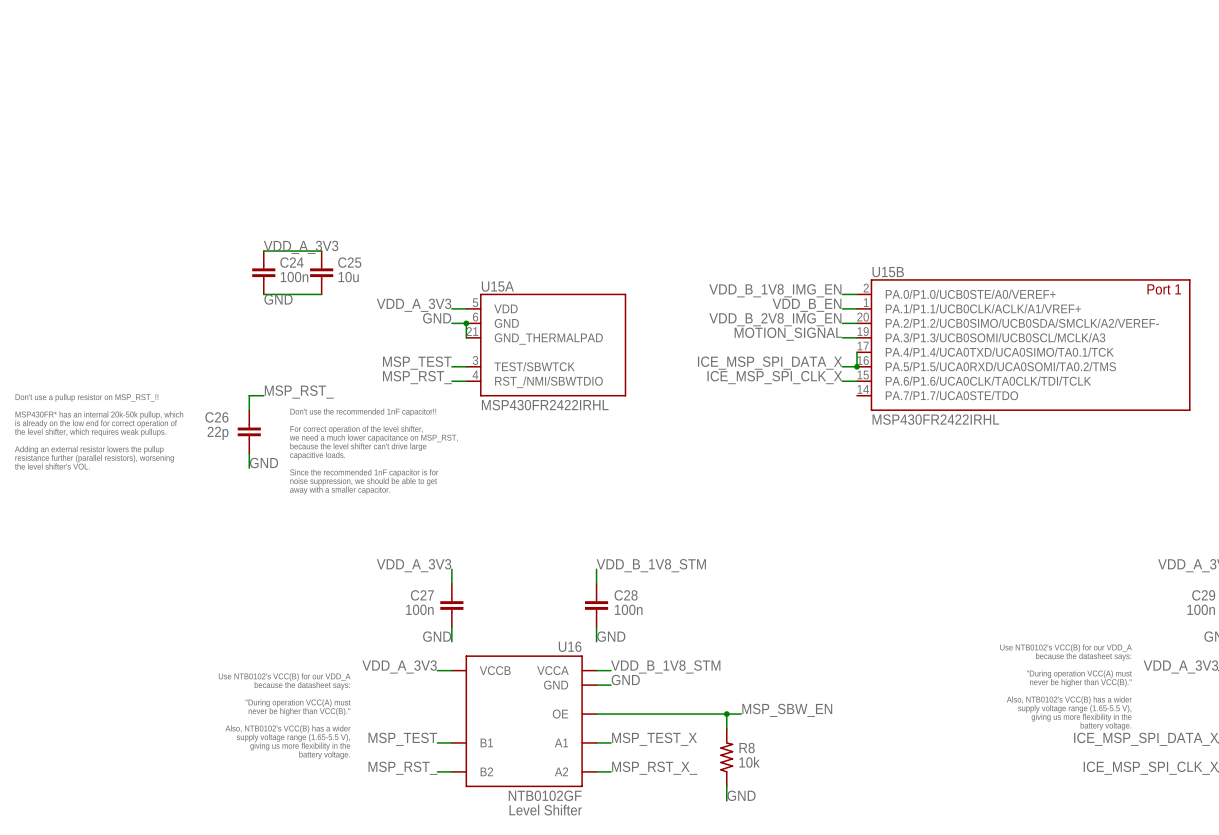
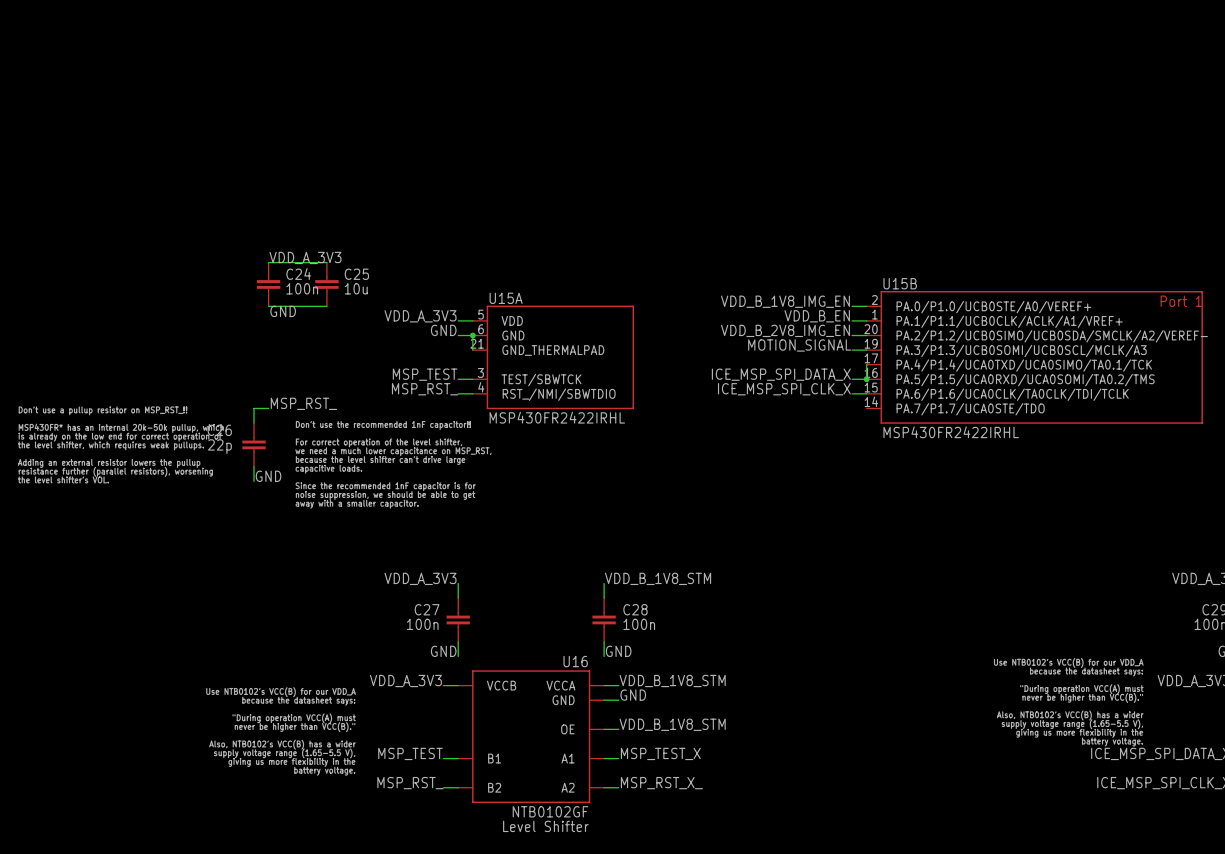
label: none -> VDD_B_1V8_STM (672, 724)
label: MSP_SBW_EN (787, 710) -> none
wire: (611, 714) (741, 714) -> none
wire: (726, 714) (726, 728) -> none
junction: (726, 714) -> none
R8: 10k (726, 757) -> none
wire: (726, 786) (726, 800) -> none
label: GND (741, 795) -> none

